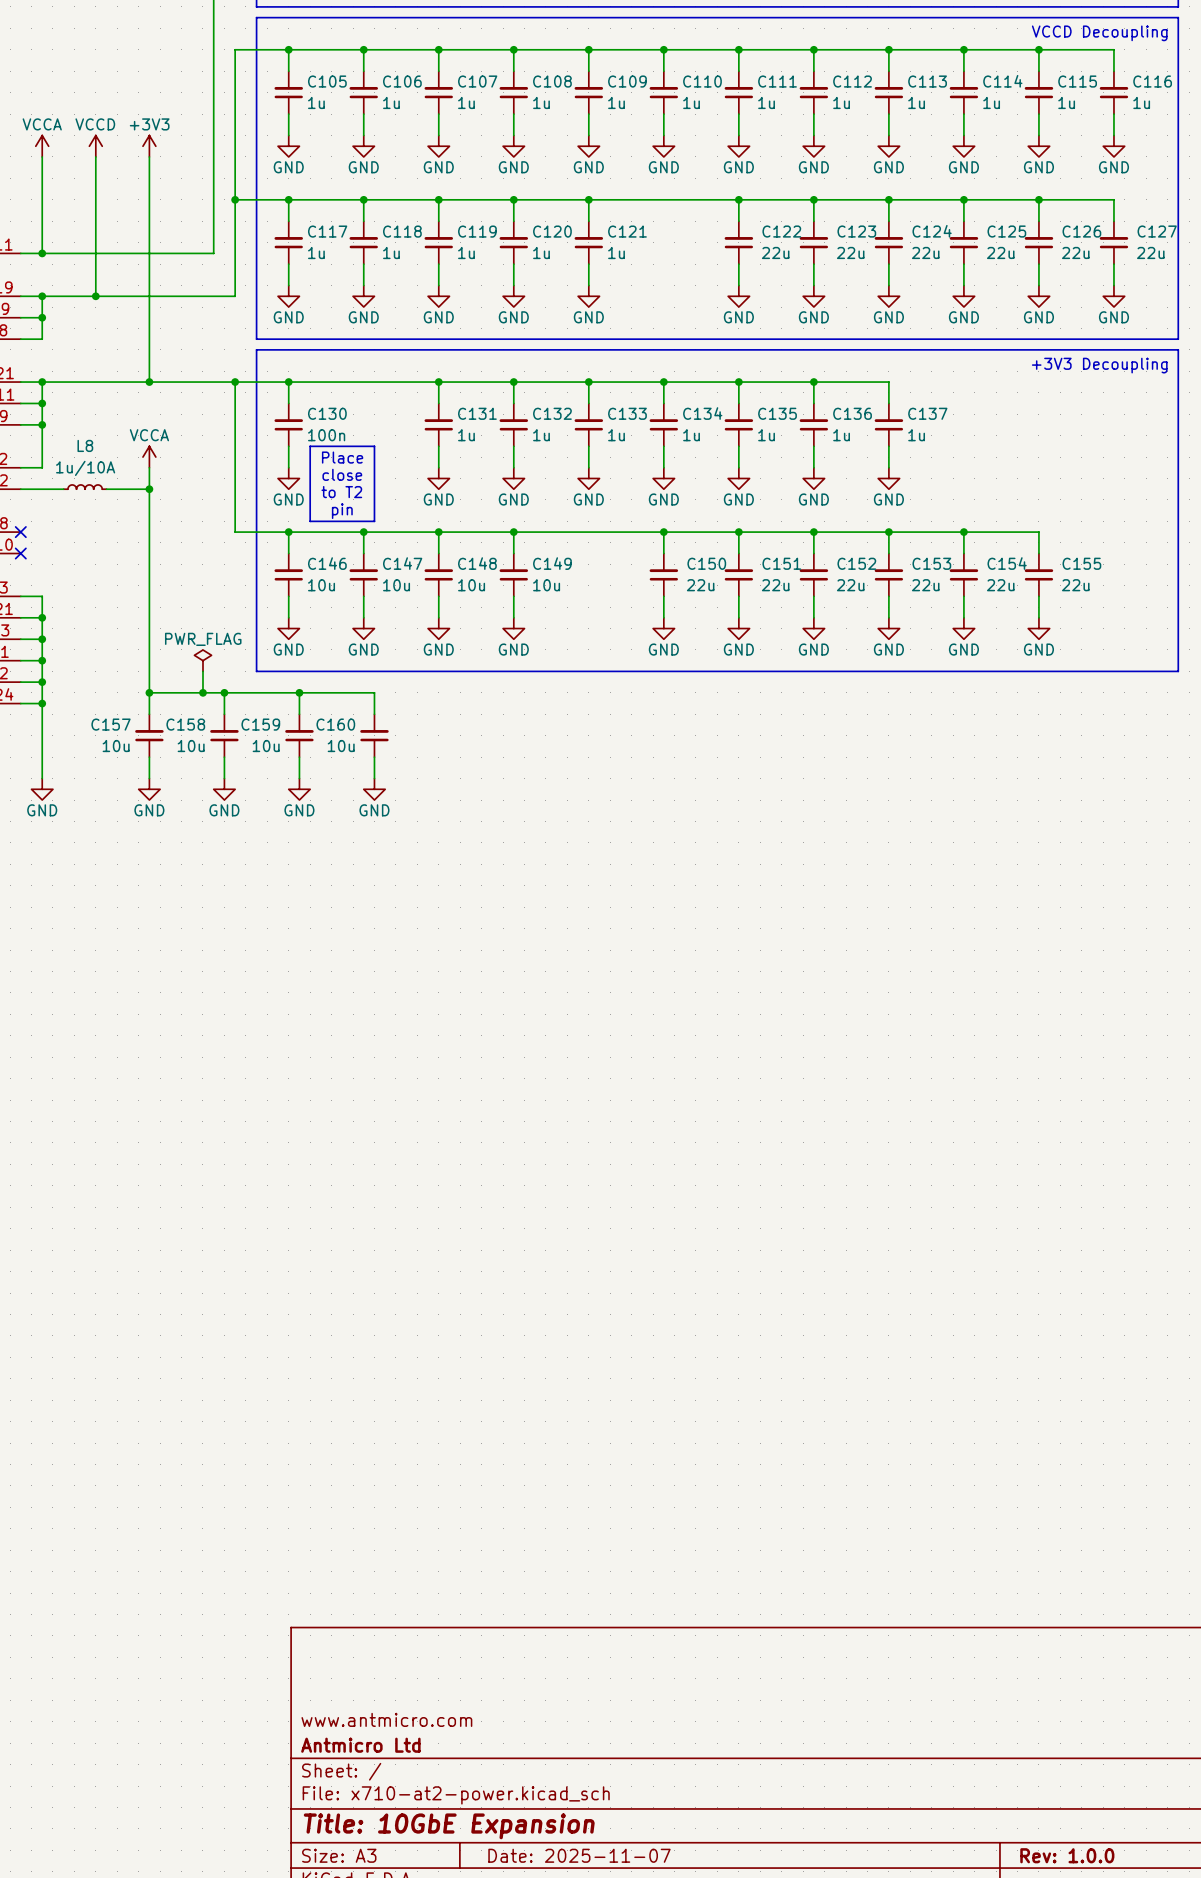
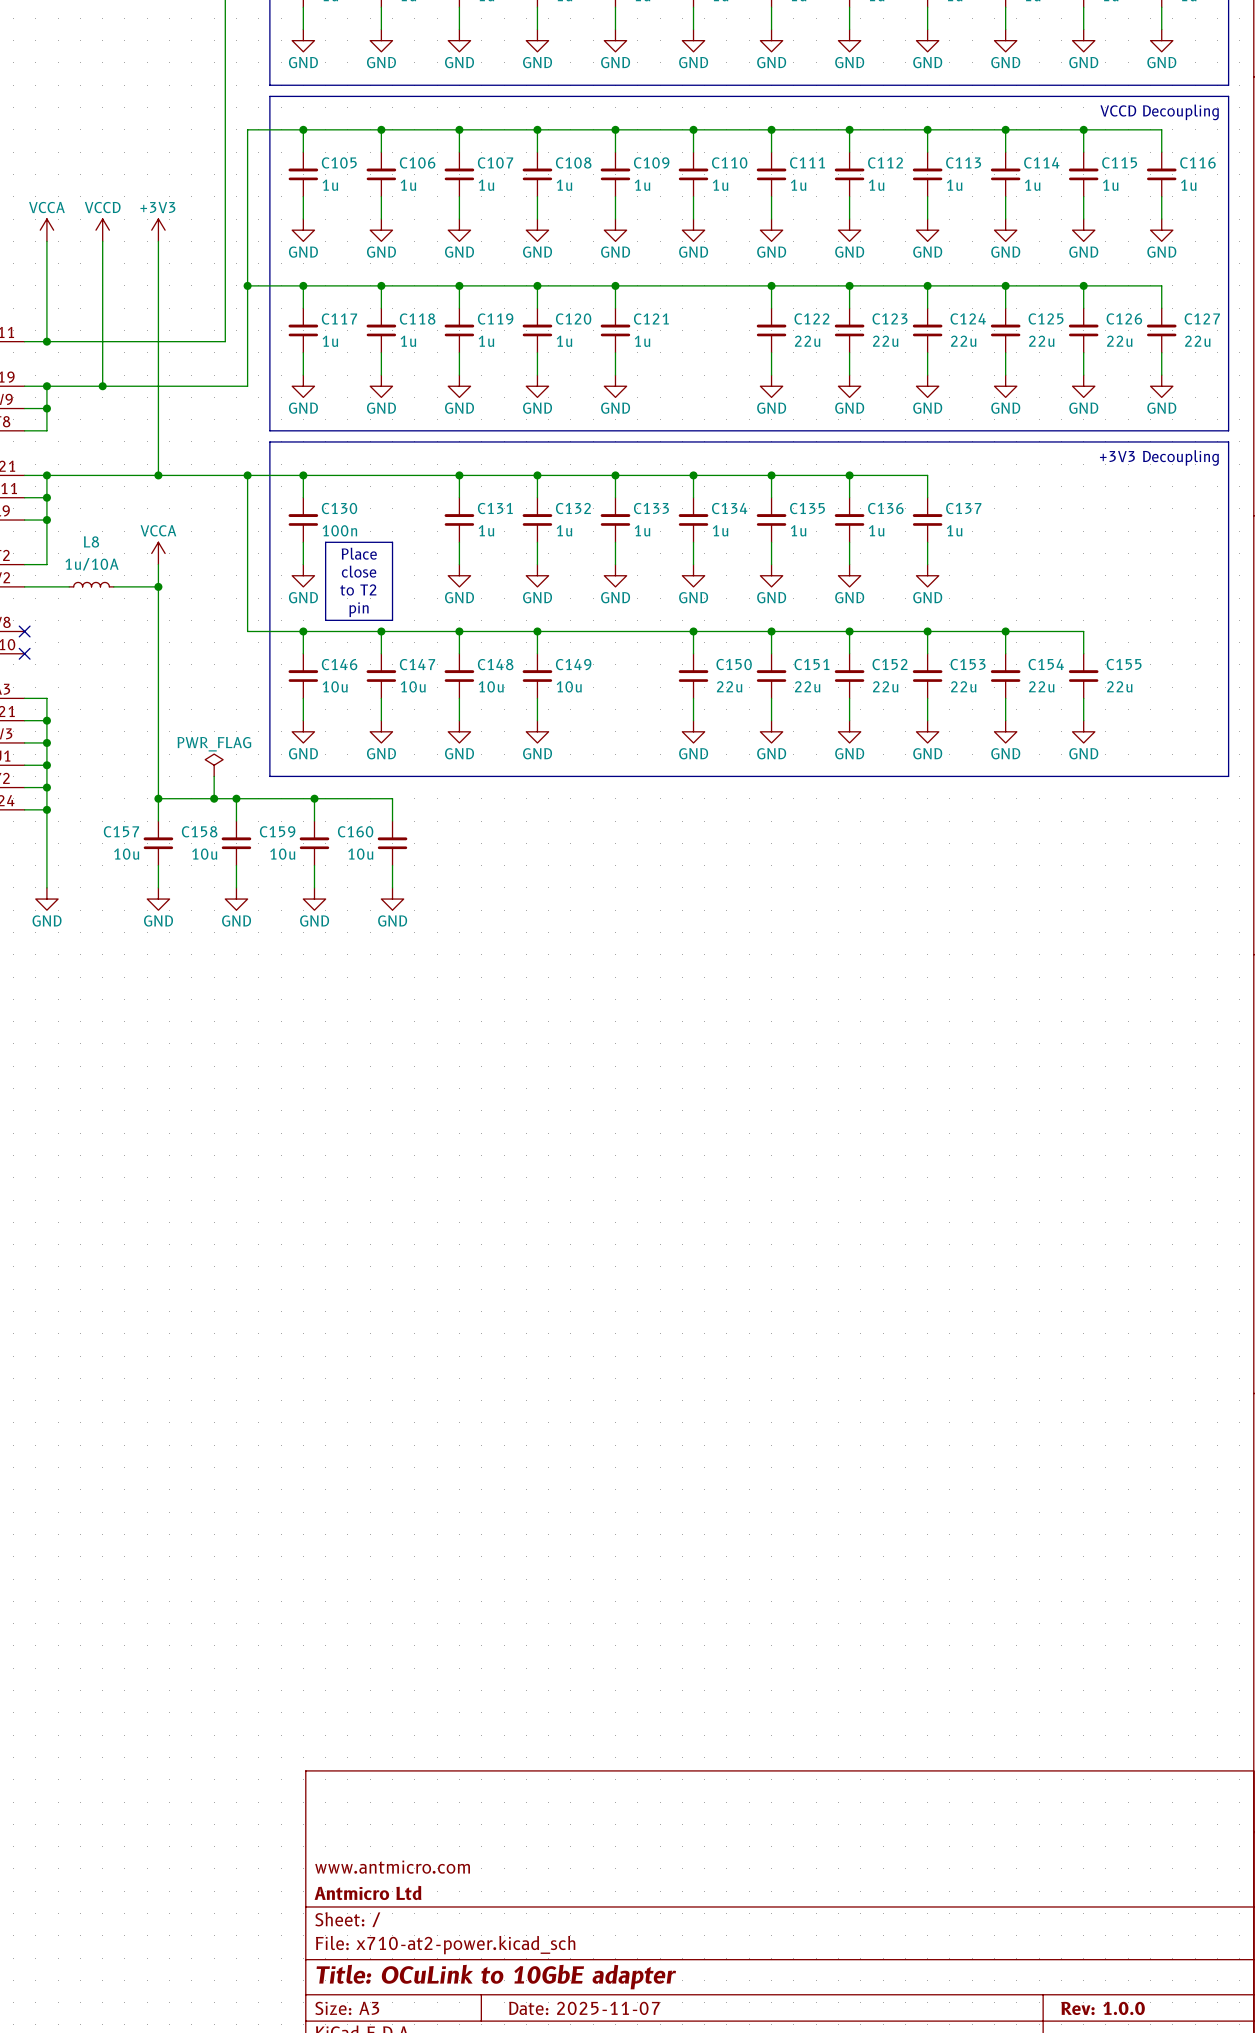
title block: Title: 10GbE Expansion (449, 1826) -> Title: OCuLink to 10GbE adapter (496, 1977)

